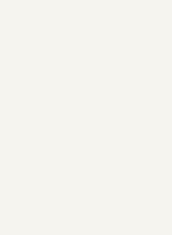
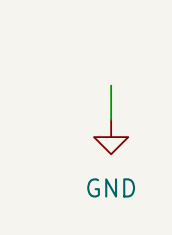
wire: none -> (111, 85) (111, 119)
power symbol: none -> GND (111, 137)

